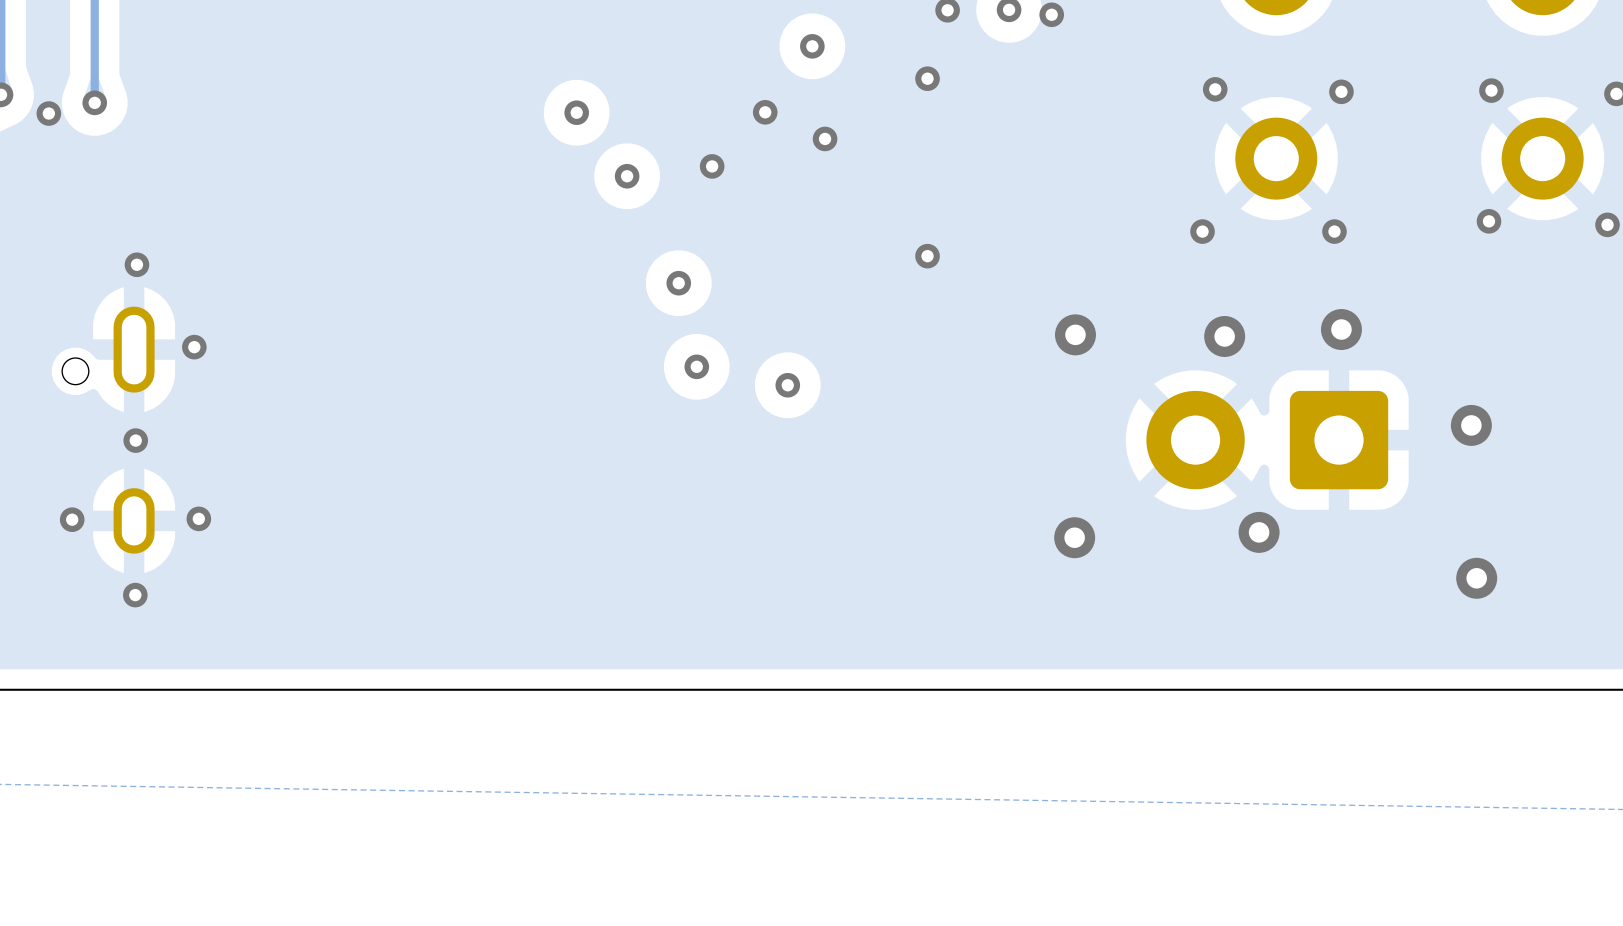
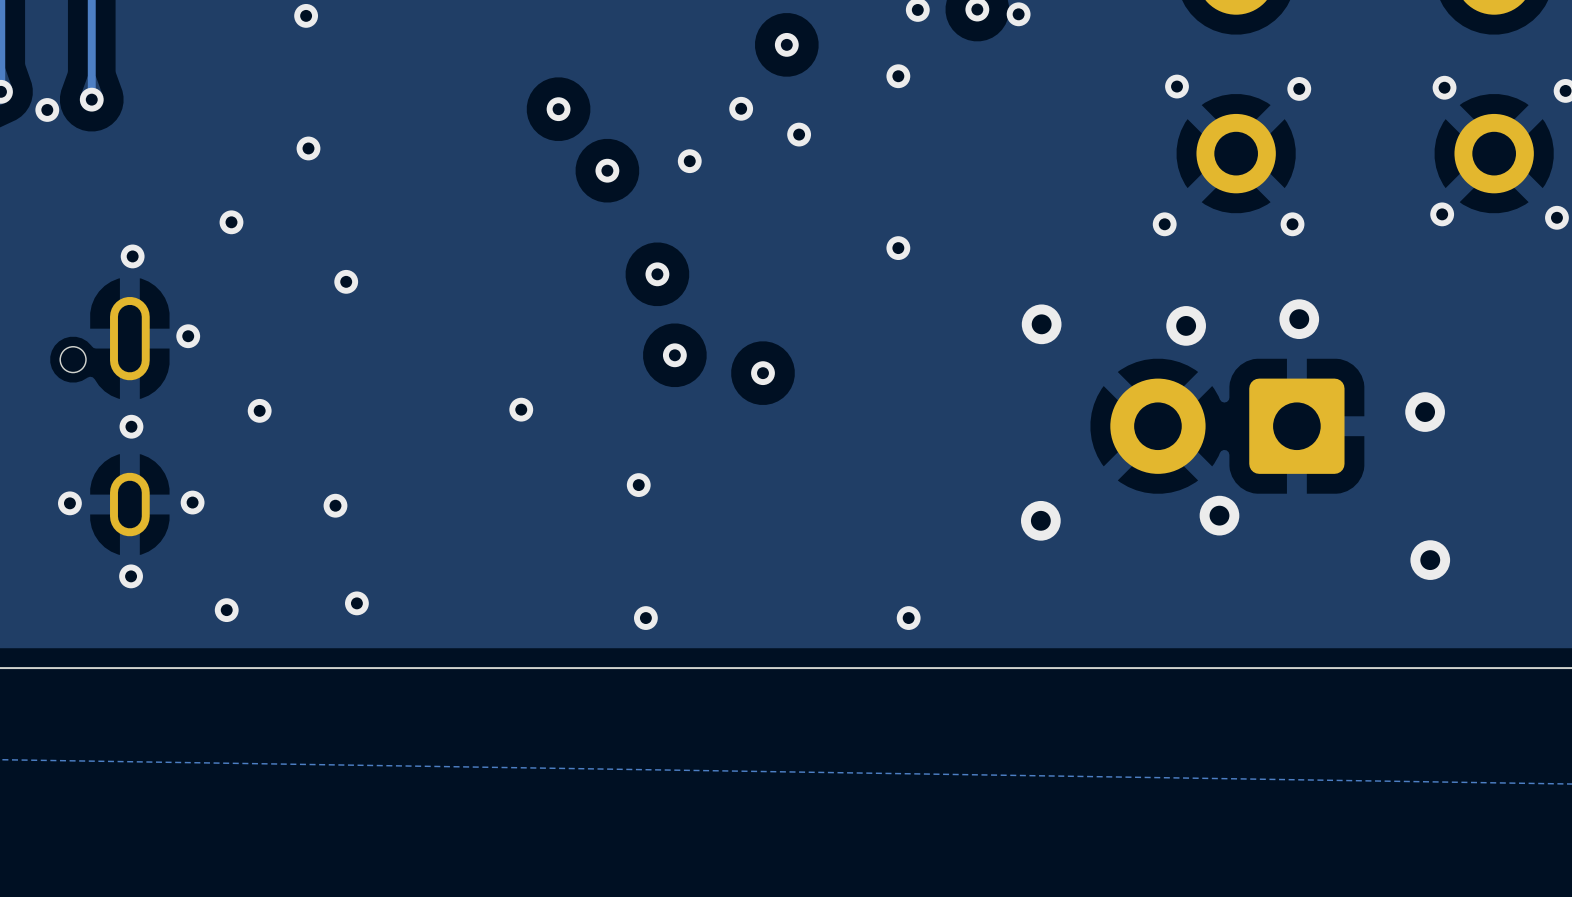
via: none -> (306, 15)
via: none -> (308, 148)
via: none -> (231, 222)
via: none -> (346, 281)
via: none -> (521, 409)
via: none -> (259, 410)
via: none -> (638, 485)
via: none -> (335, 505)
via: none -> (356, 603)
via: none -> (226, 610)
via: none -> (645, 618)
via: none -> (908, 618)

